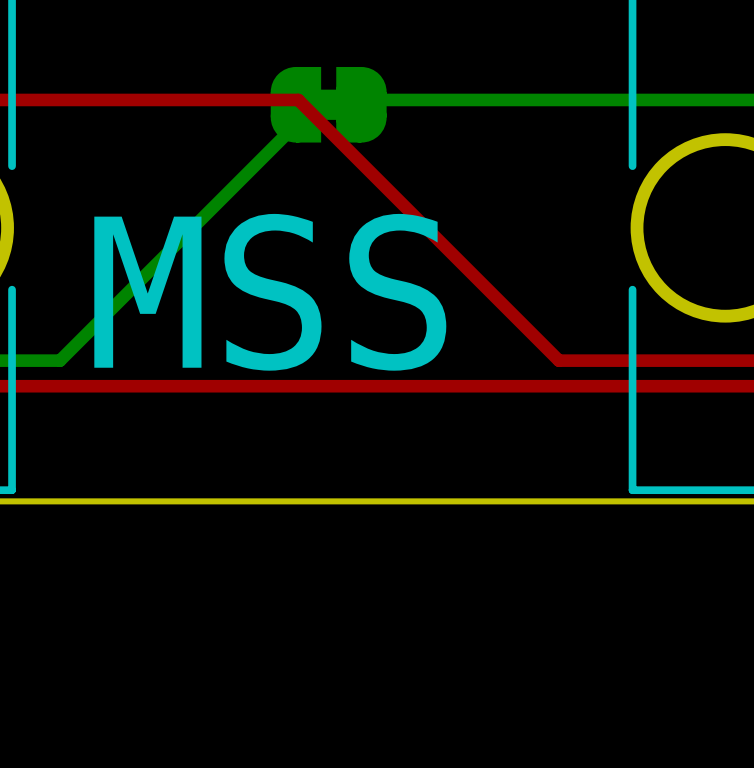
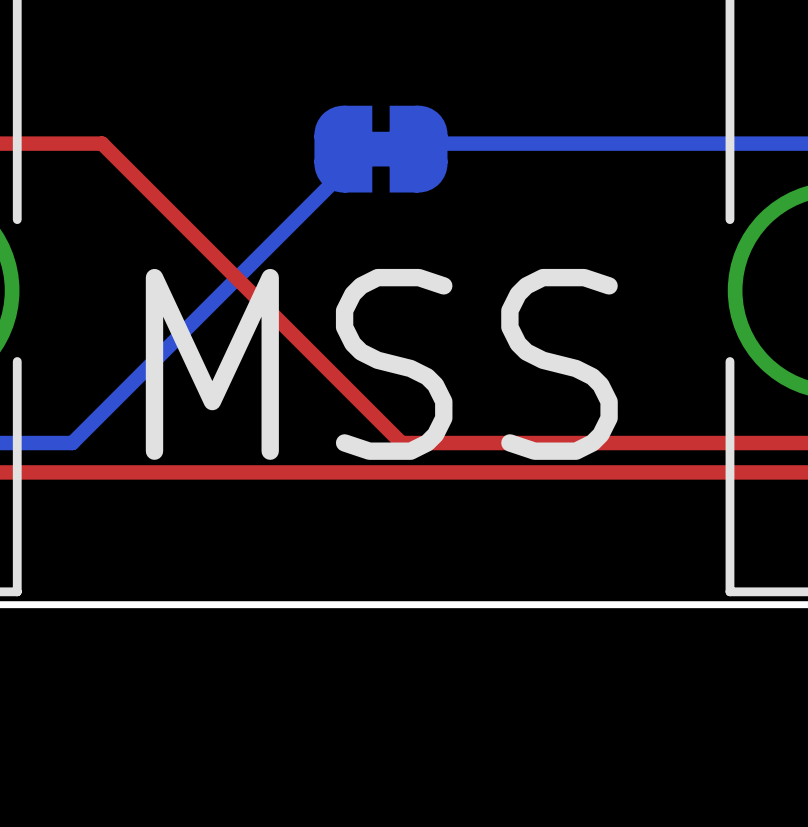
top track: (85, 99) (298, 99) (558, 360) -> (102, 143) (401, 443) (645, 443)

